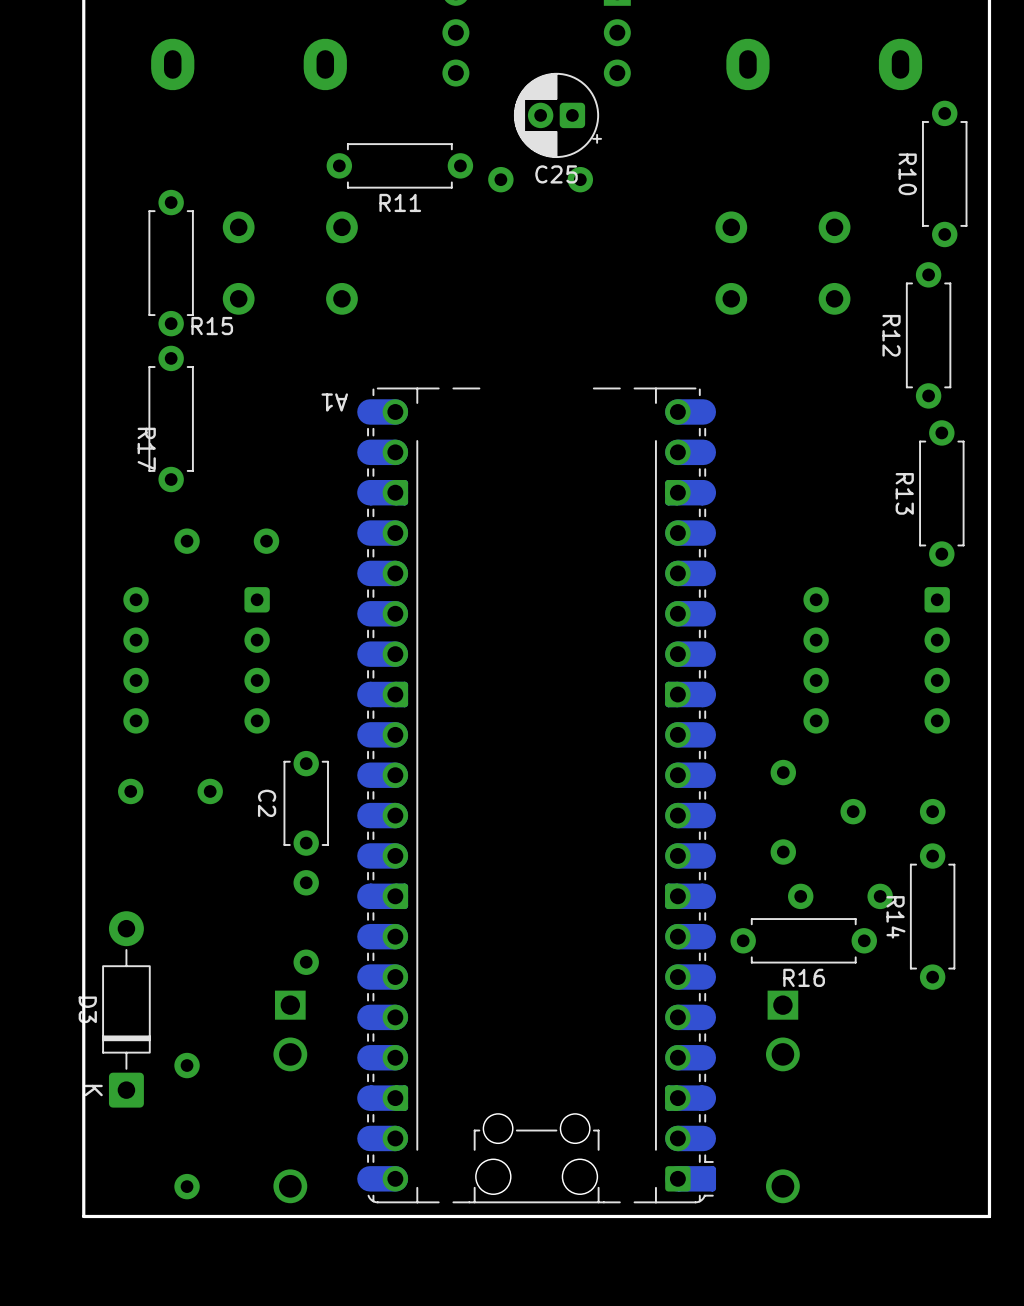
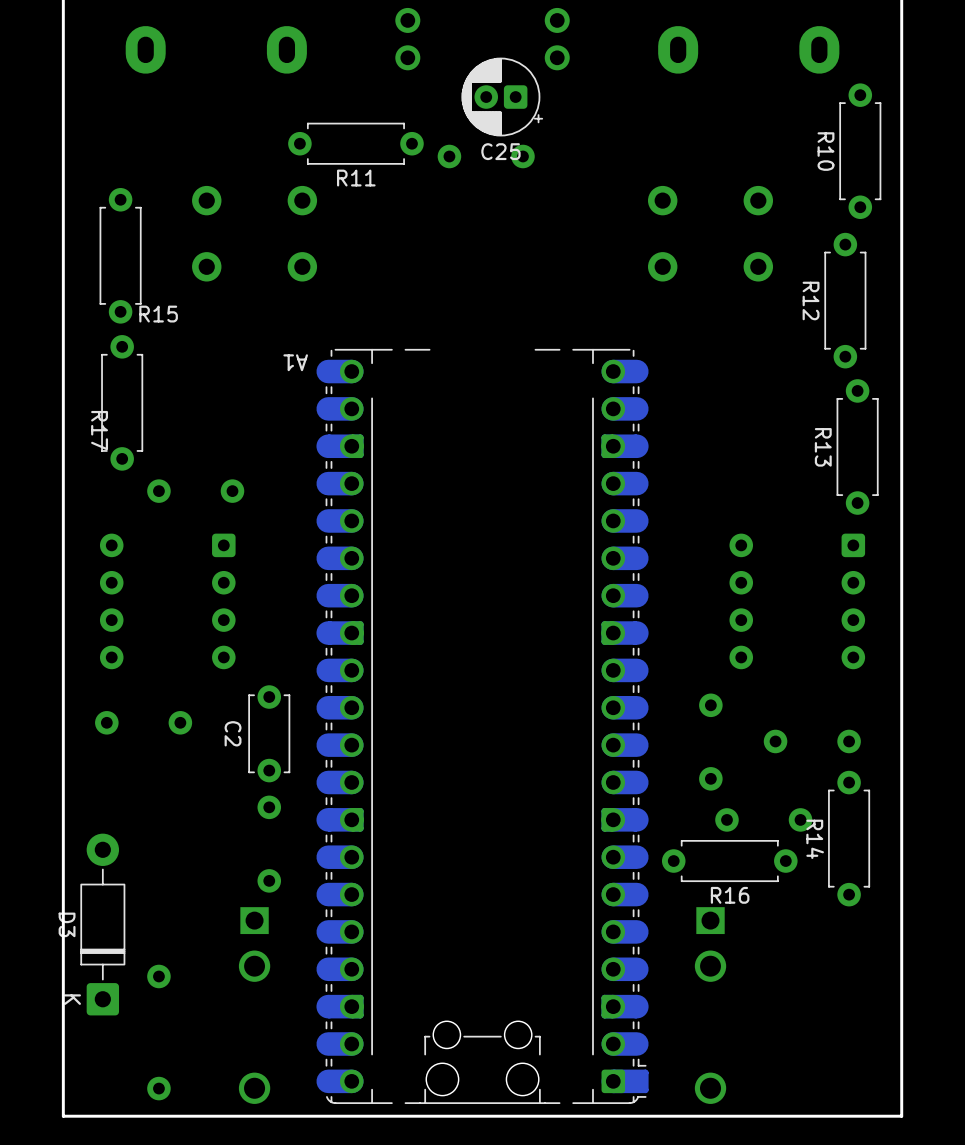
R15 position: (171, 263) -> (120, 255)
R17 position: (171, 418) -> (122, 402)

